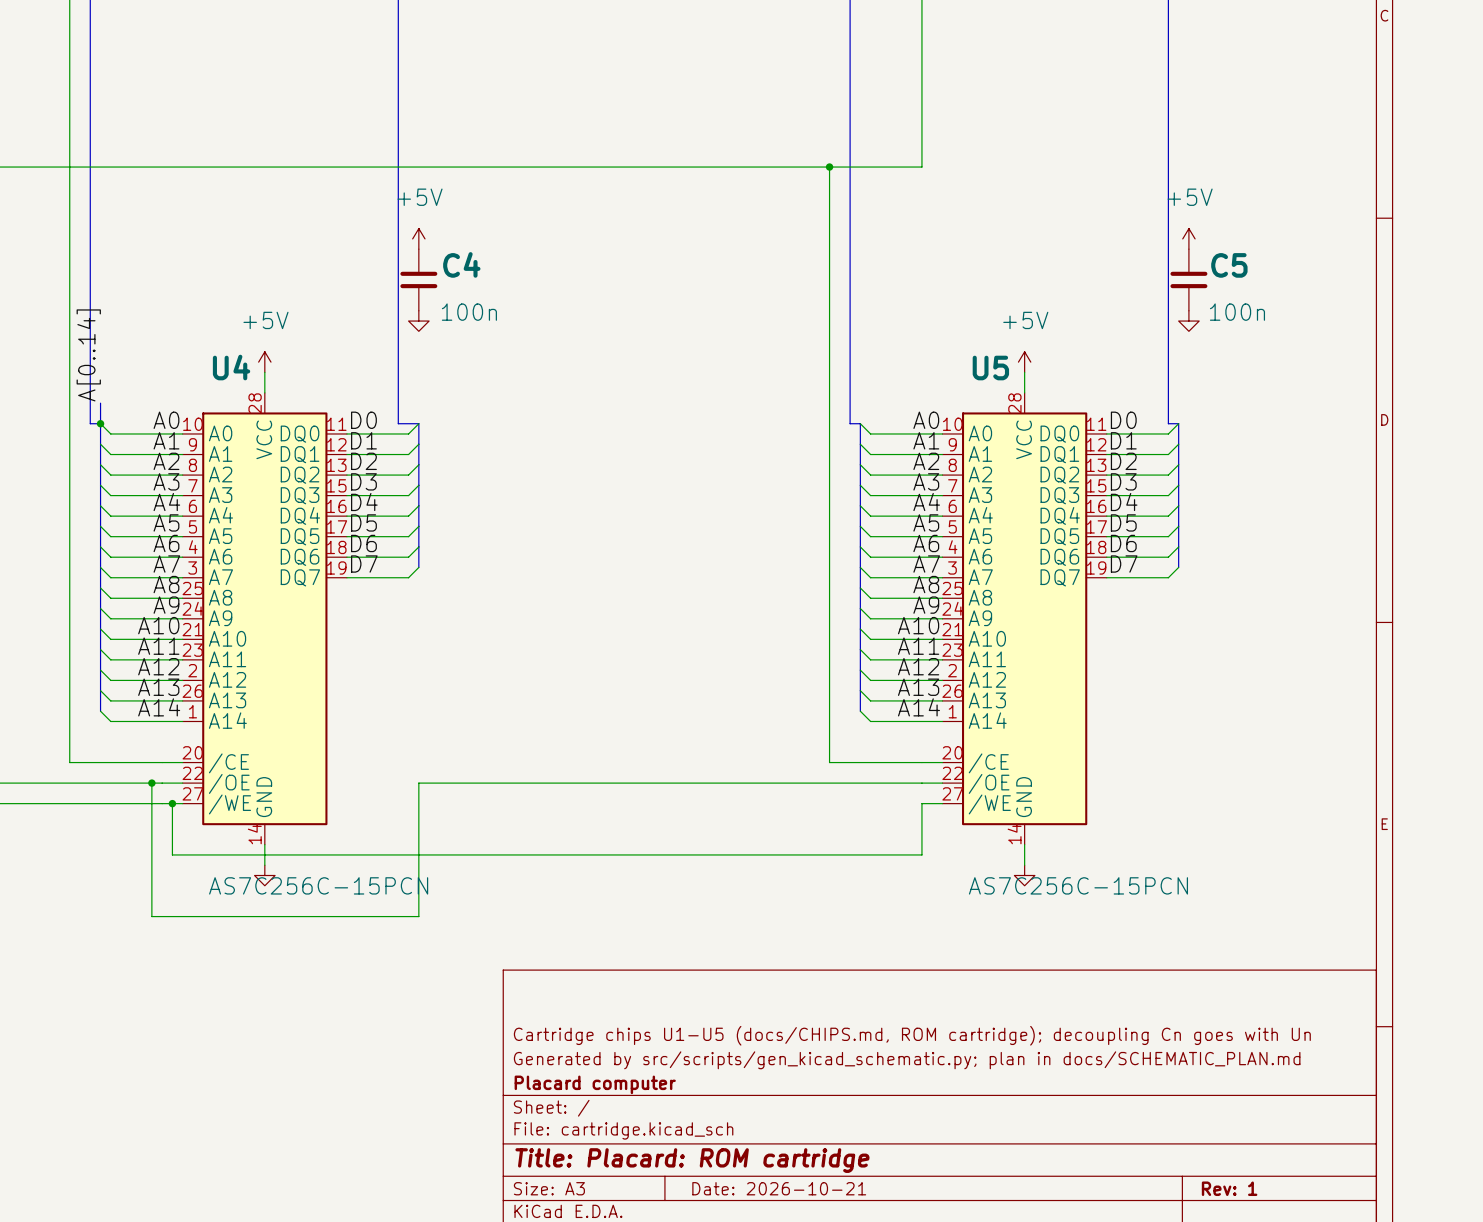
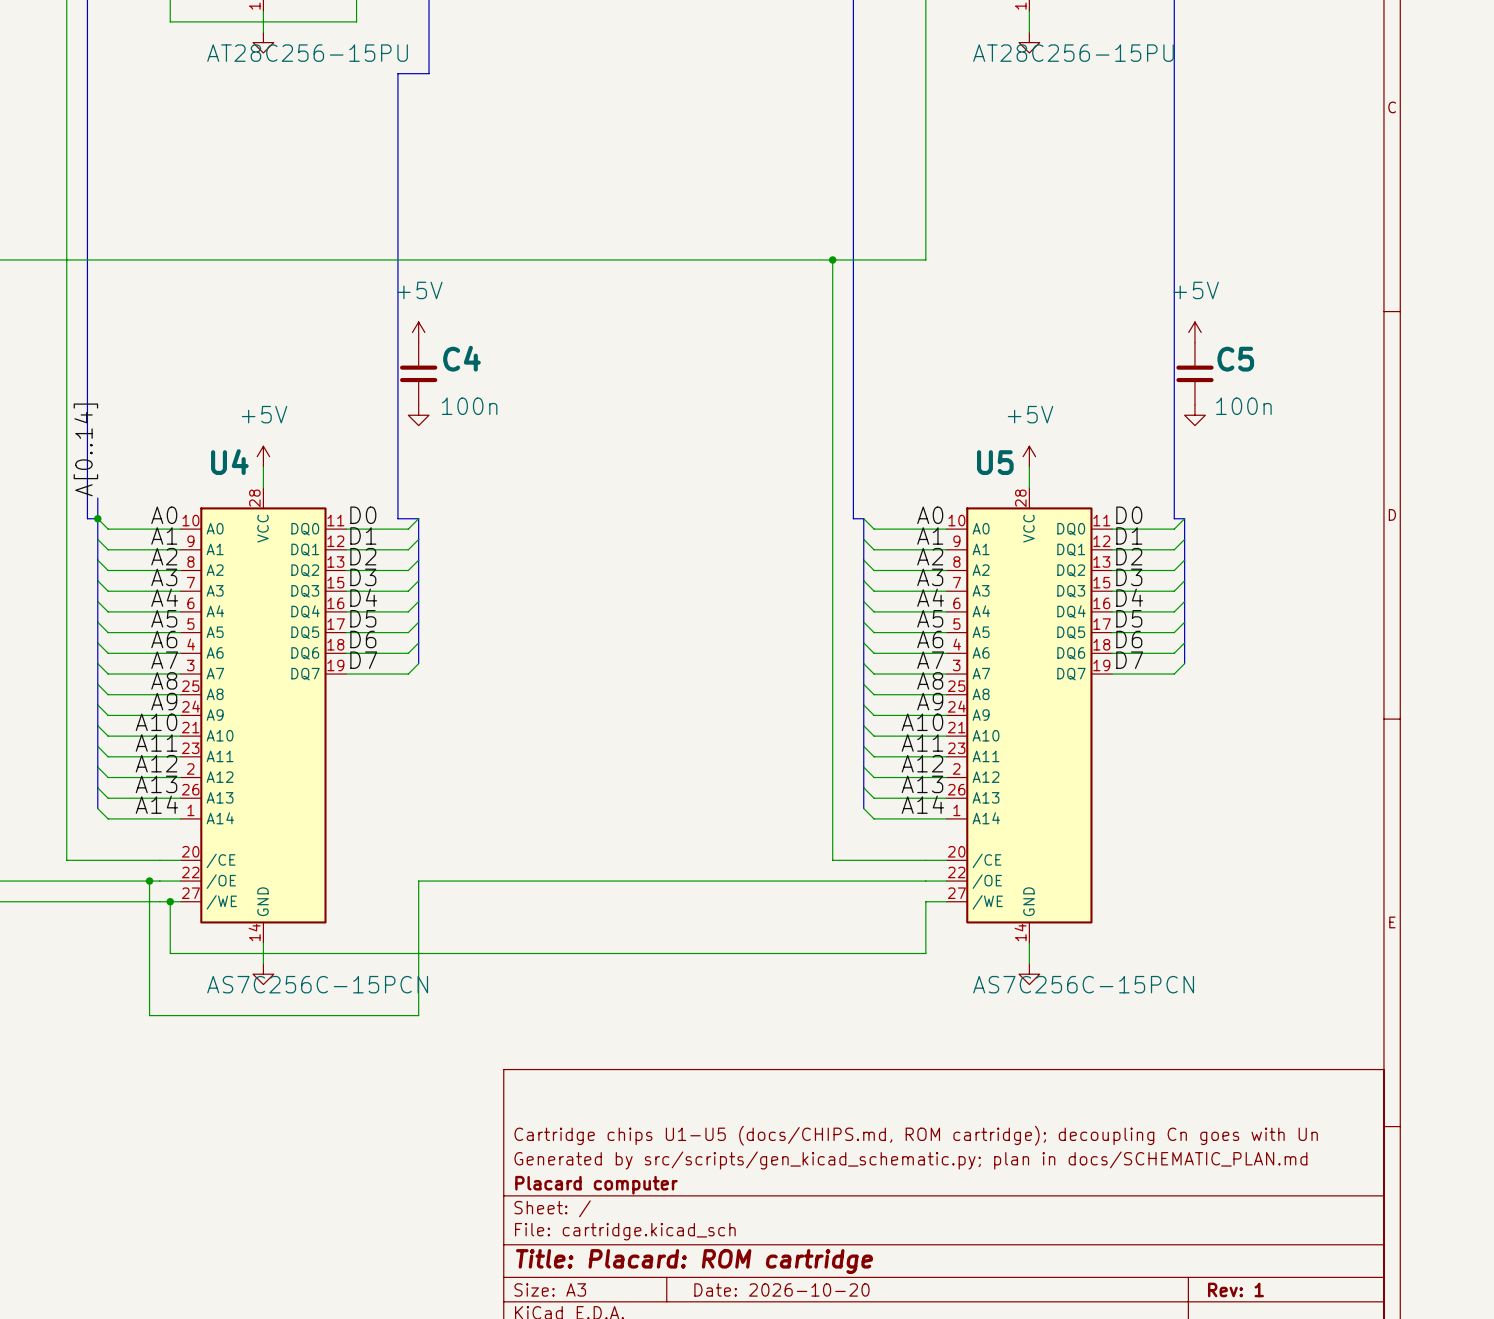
U4 symbol: [182, 392, 347, 845] -> [180, 487, 347, 944]
U5 symbol: [942, 392, 1107, 845] -> [946, 487, 1113, 944]
title block: Date: 2026-10-21 (779, 1188) -> Date: 2026-10-20 (781, 1289)

